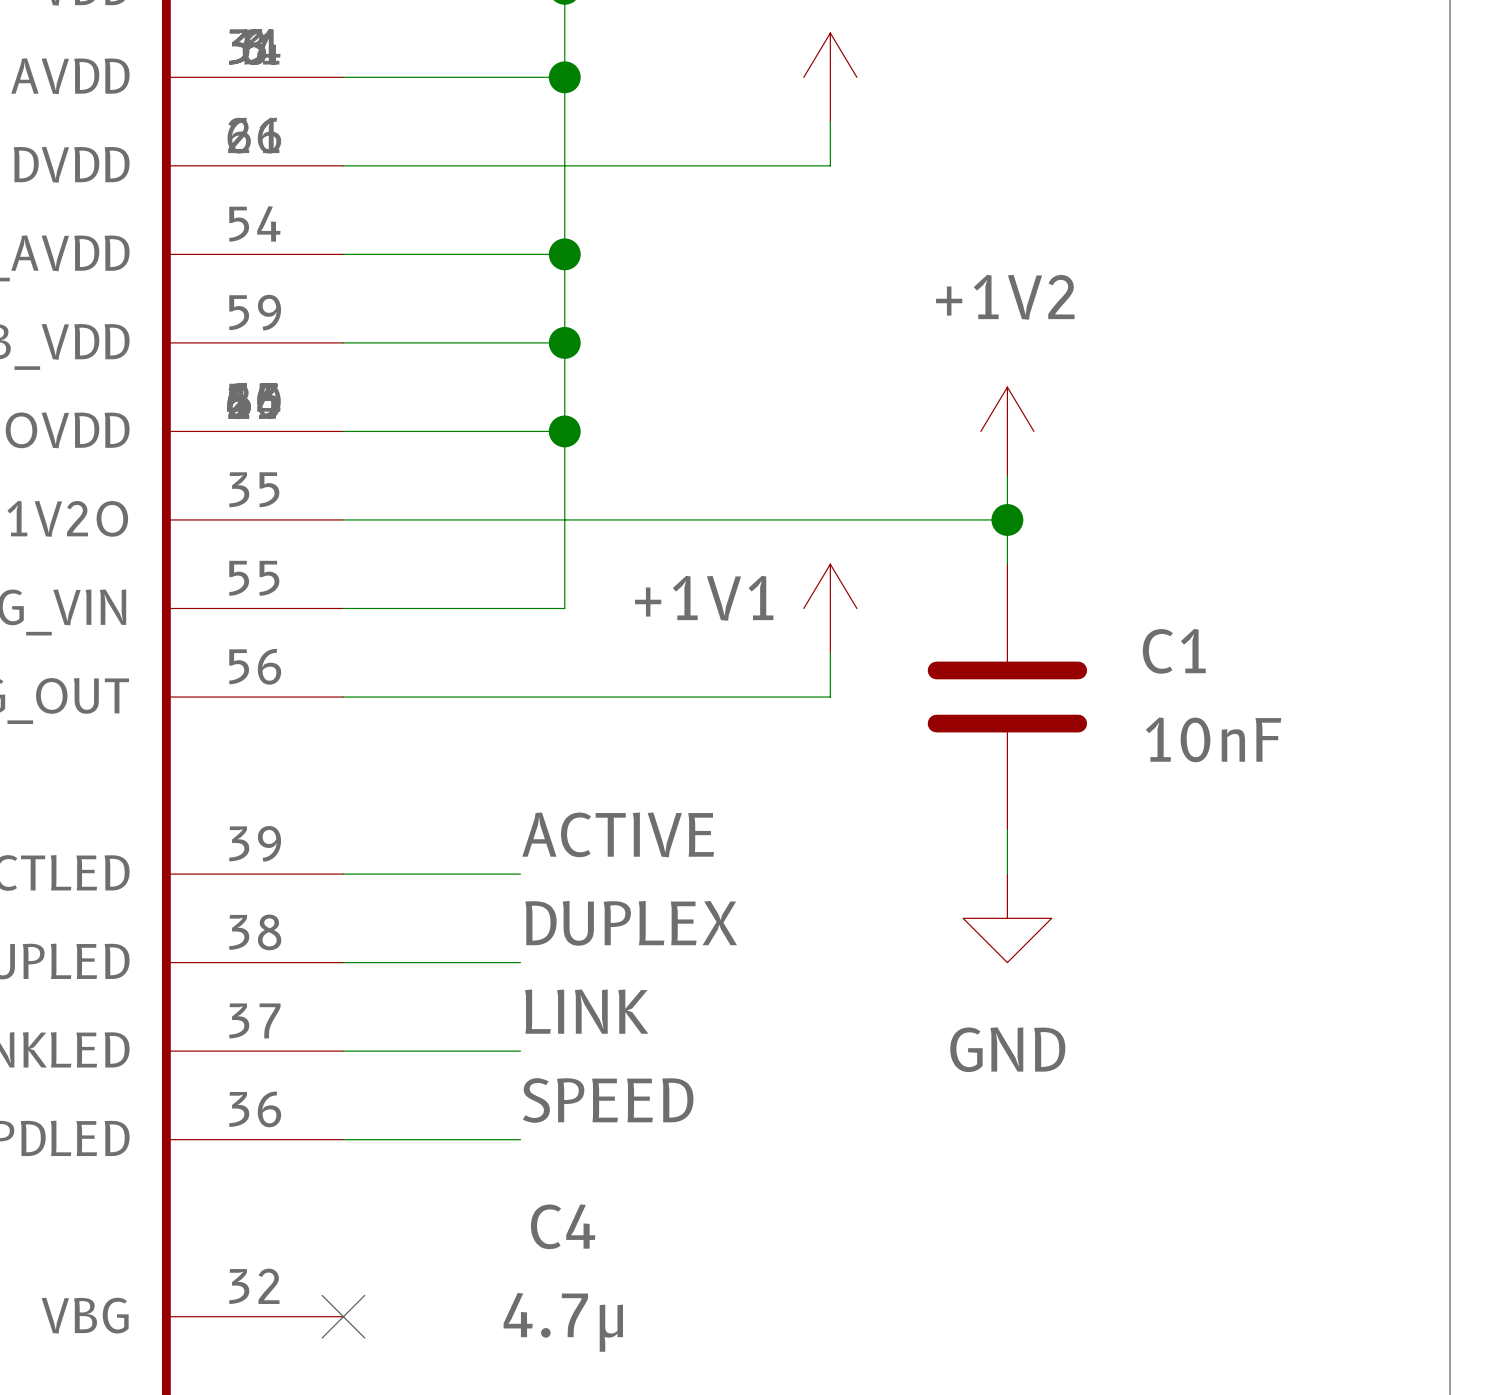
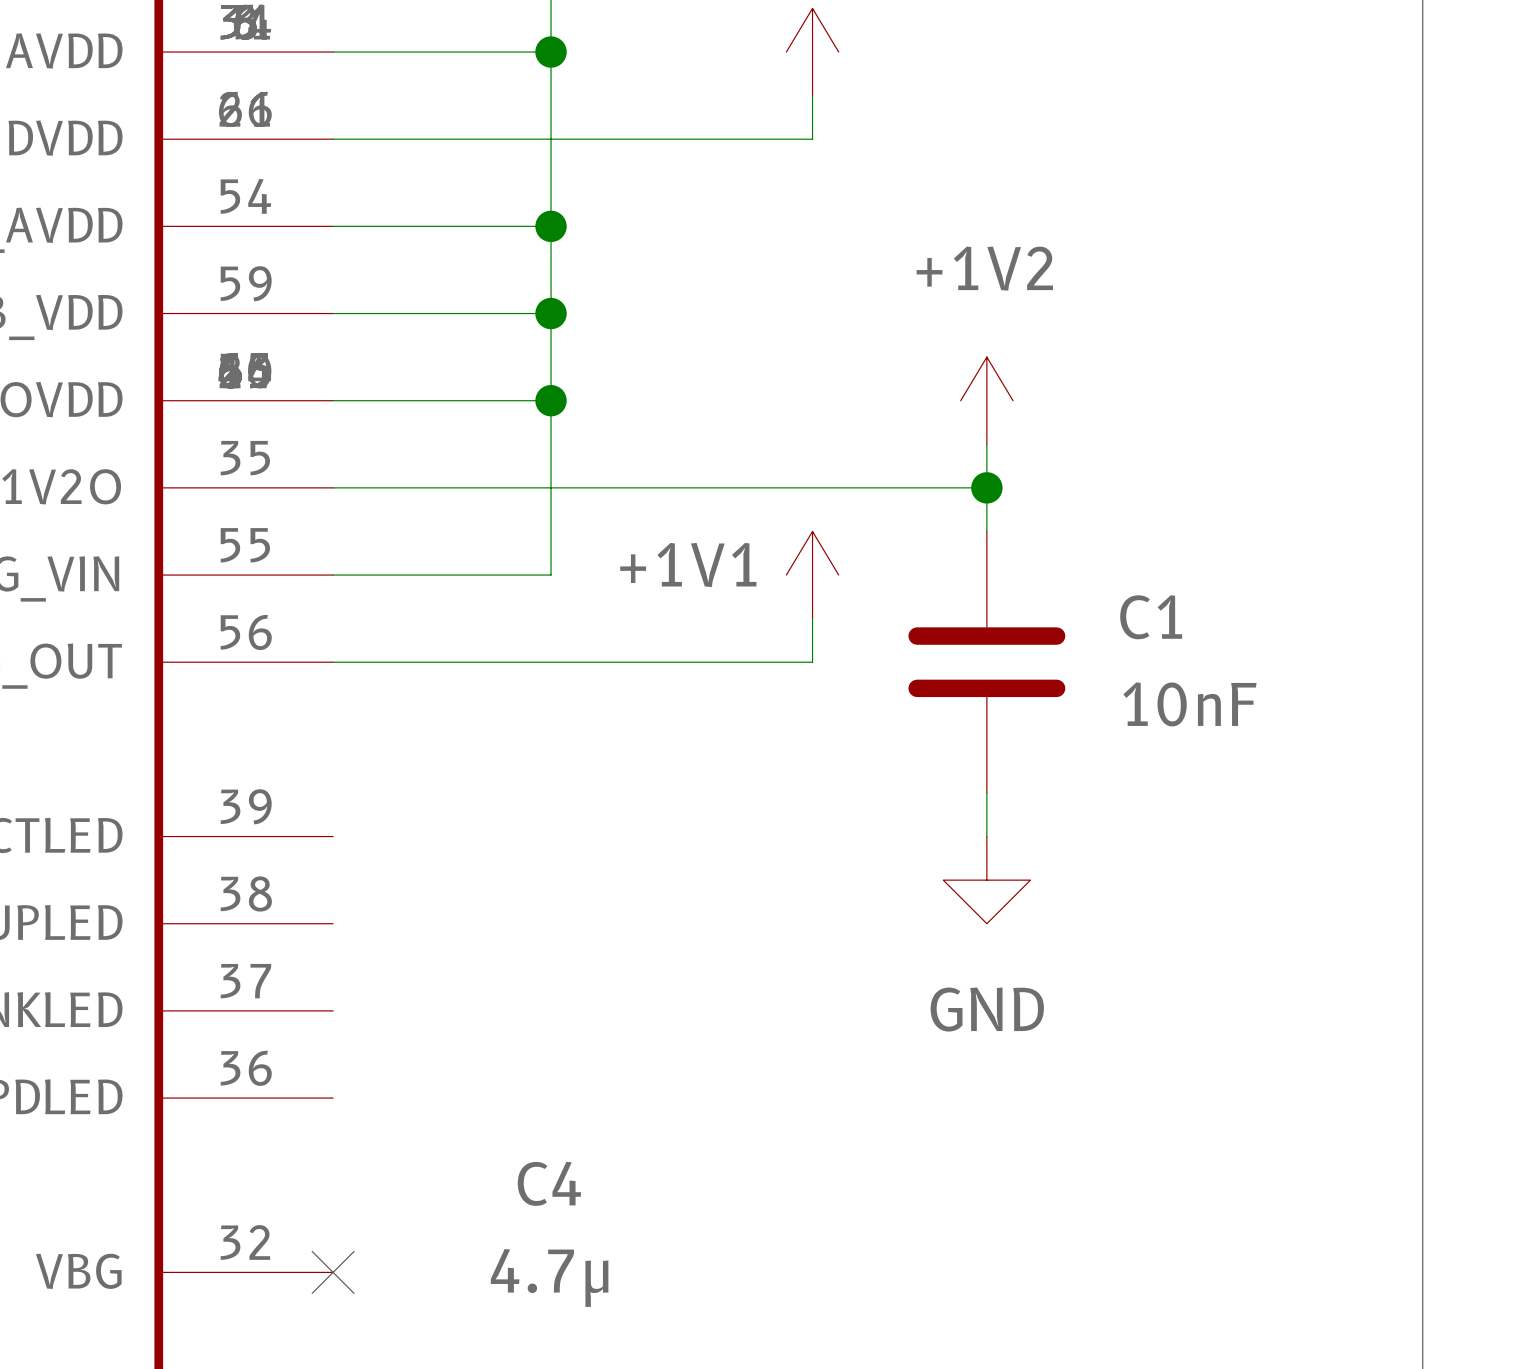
label: ACTIVE (618, 834) -> none
wire: (343, 874) (520, 874) -> none
label: DUPLEX (631, 923) -> none
wire: (343, 962) (520, 962) -> none
label: LINK (586, 1011) -> none
wire: (343, 1051) (520, 1051) -> none
label: SPEED (608, 1100) -> none
wire: (343, 1139) (520, 1139) -> none

